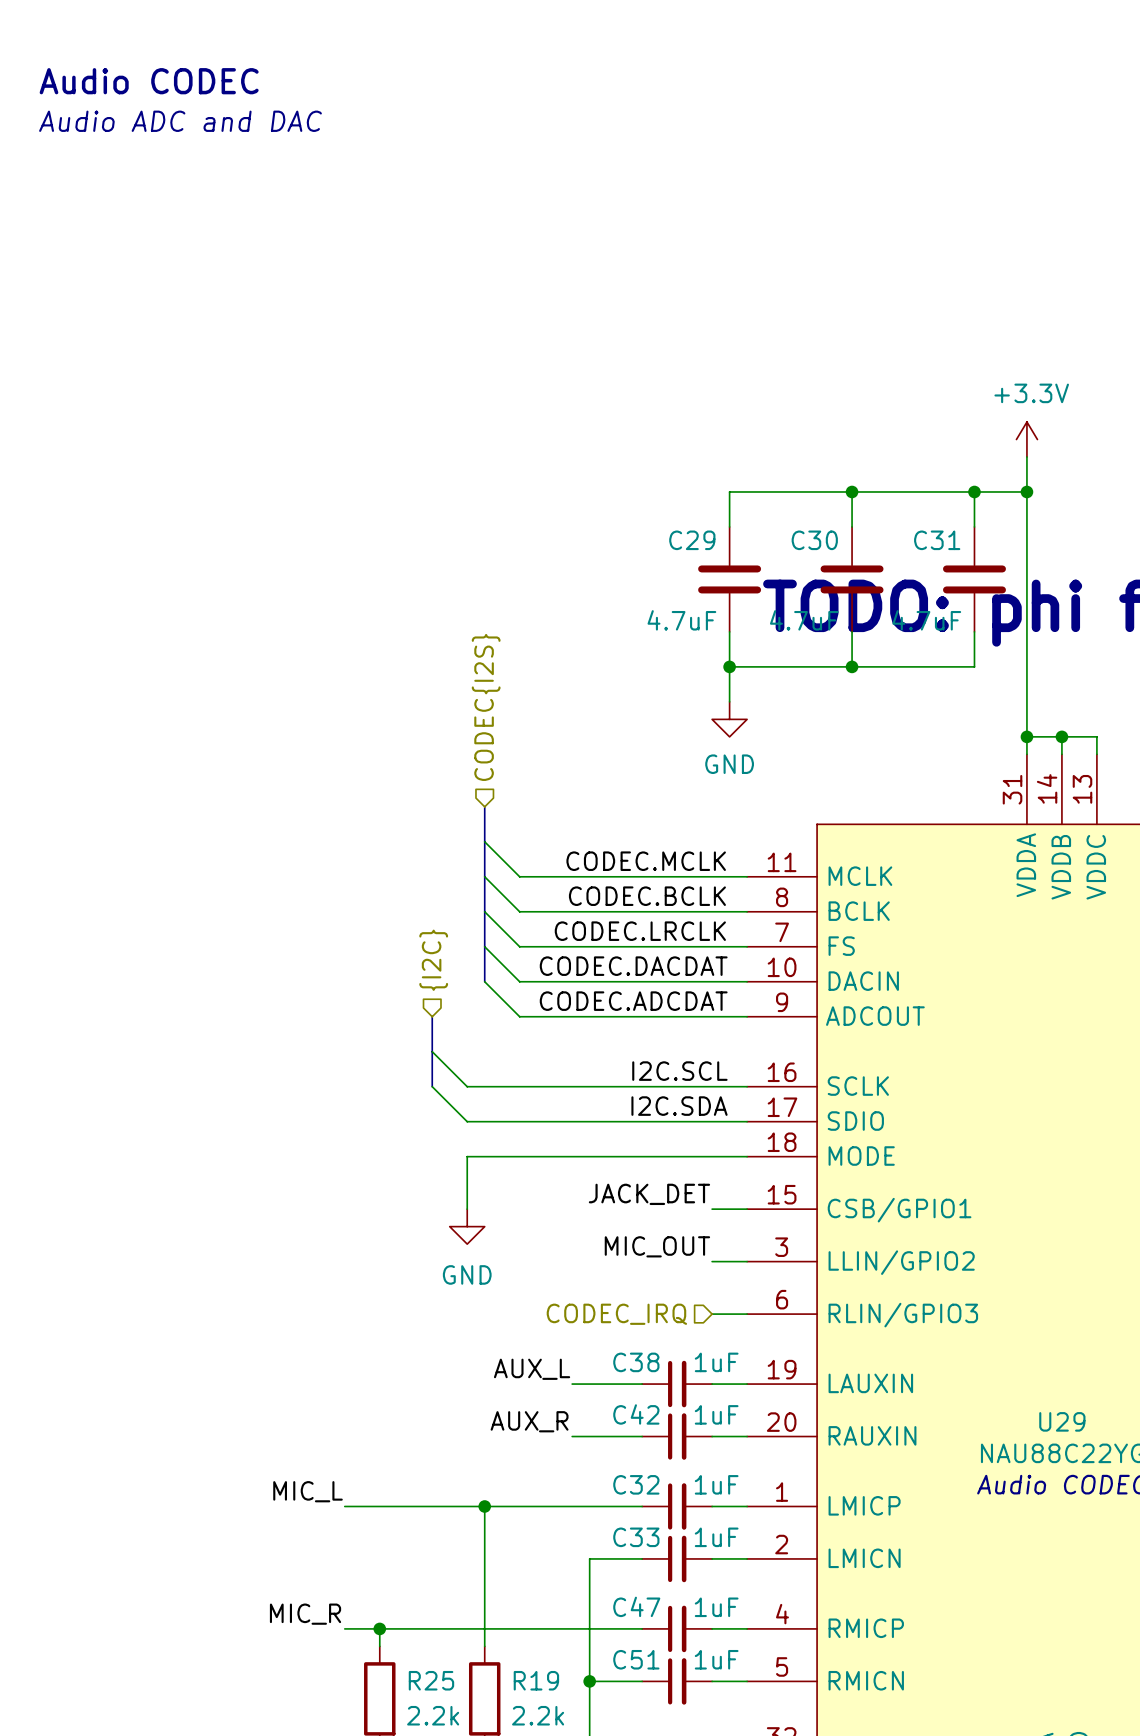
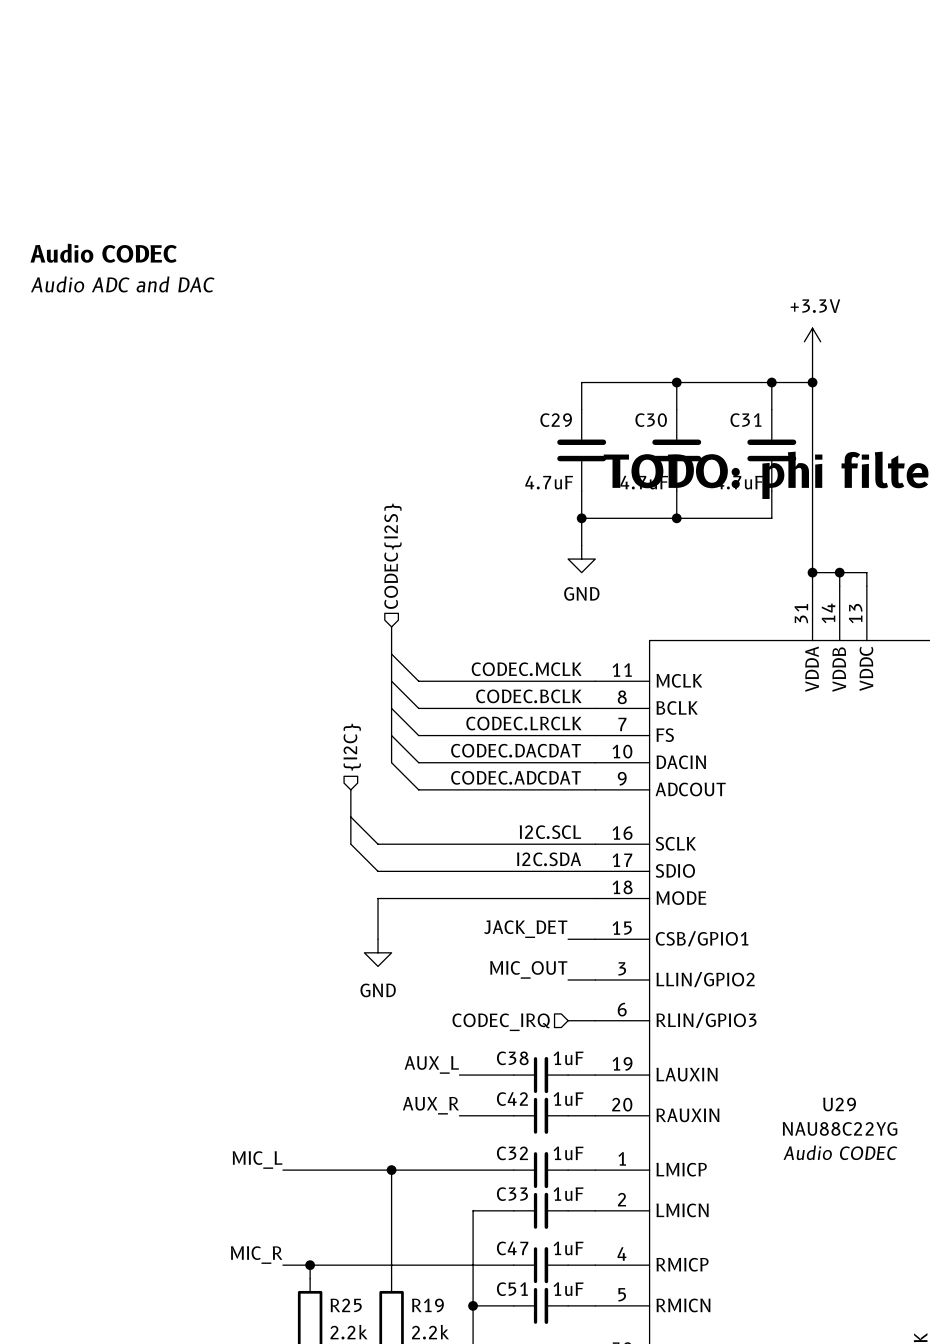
text position: Audio CODEC (149, 81) -> Audio CODEC (103, 253)
text position: Audio ADC and DAC (180, 121) -> Audio ADC and DAC (122, 284)

